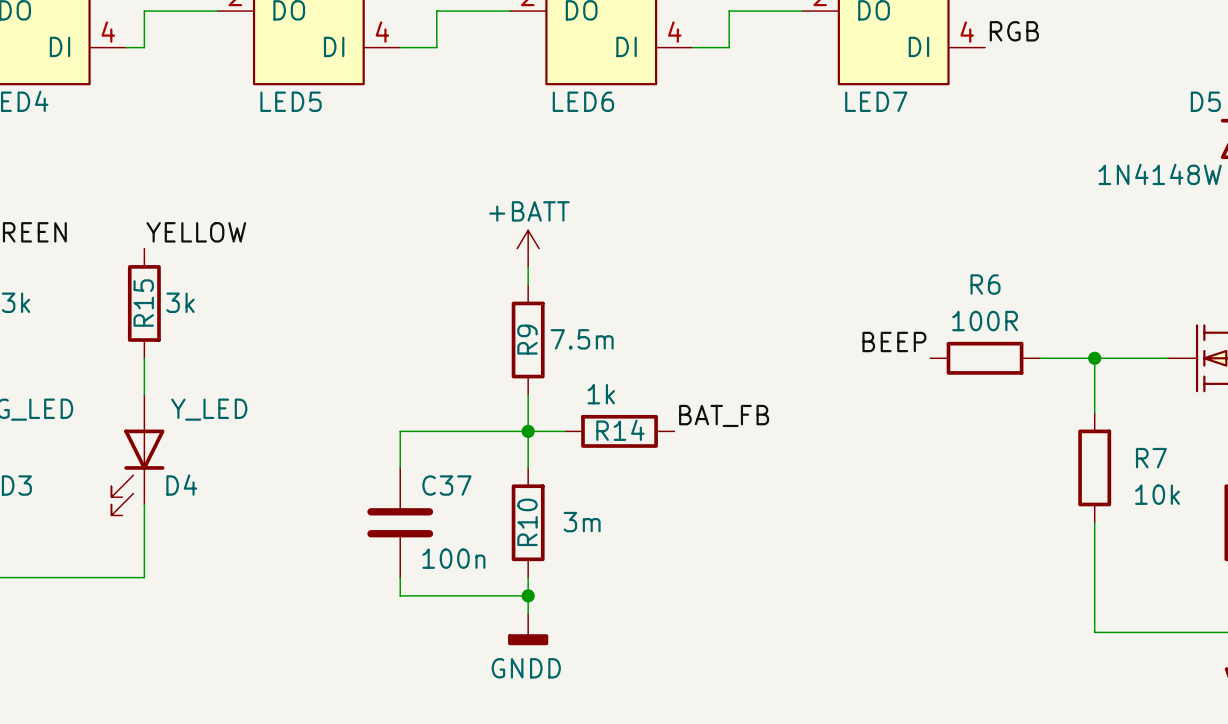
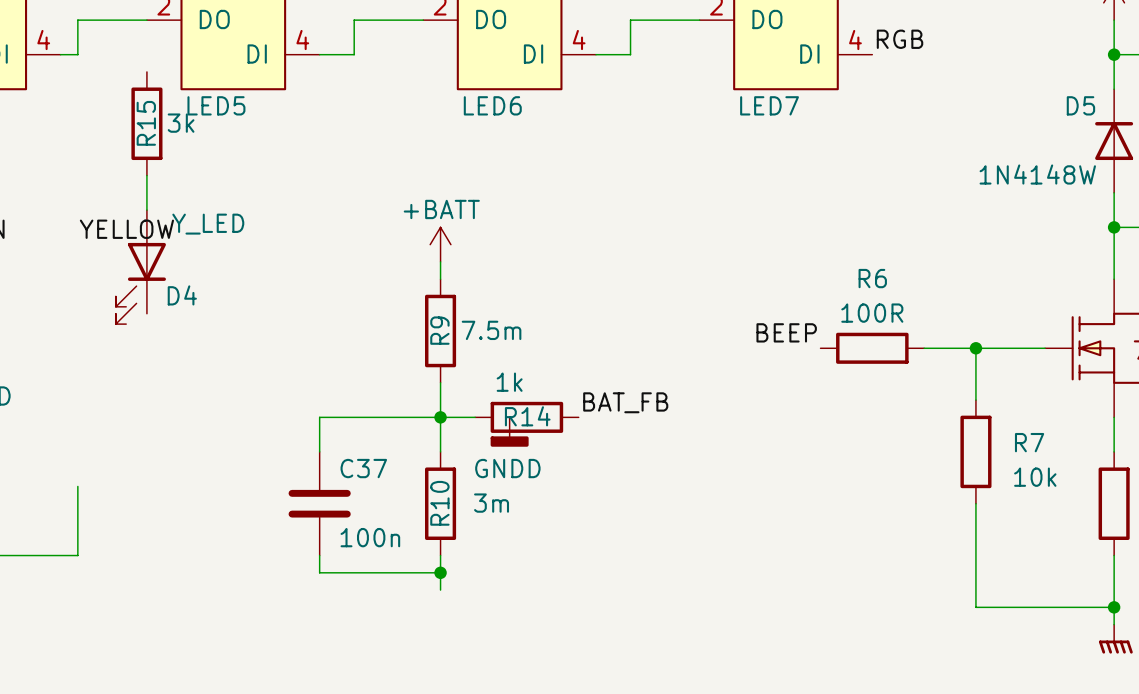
R15 position: (144, 303) -> (146, 123)
wire: (144, 358) (144, 394) -> (146, 175) (146, 210)
D4 position: (137, 455) -> (140, 267)
power symbol position: GNDD (528, 629) -> GNDD (509, 432)

